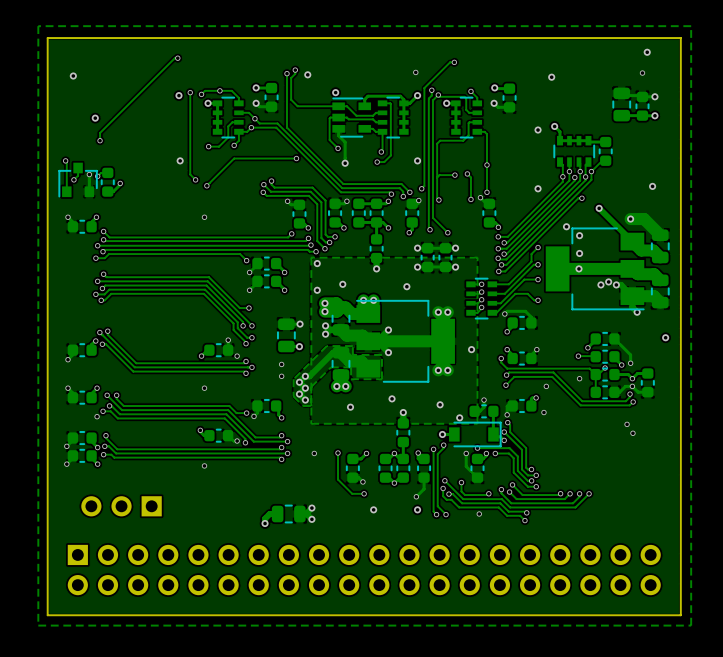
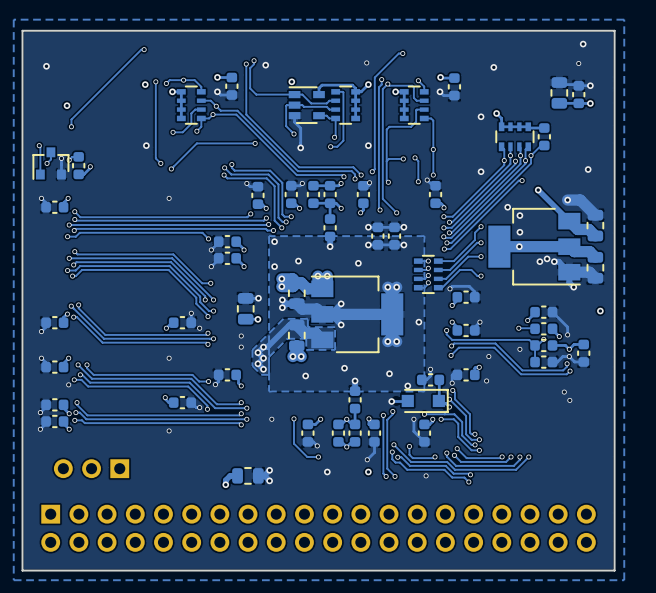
part footprint: [449, 421, 502, 448] -> [401, 389, 449, 413]

